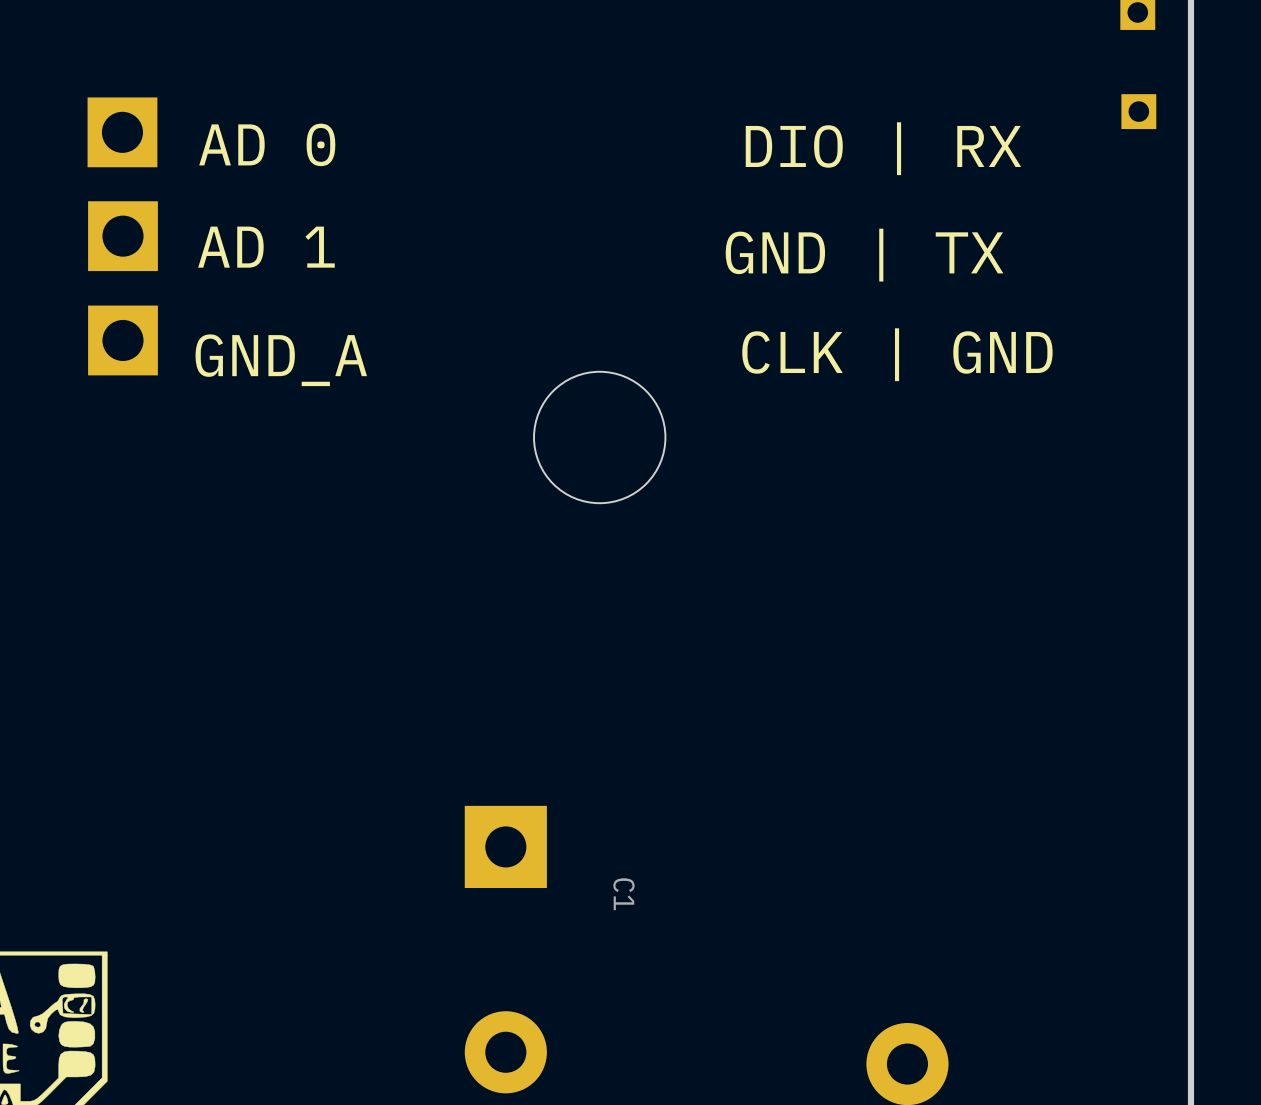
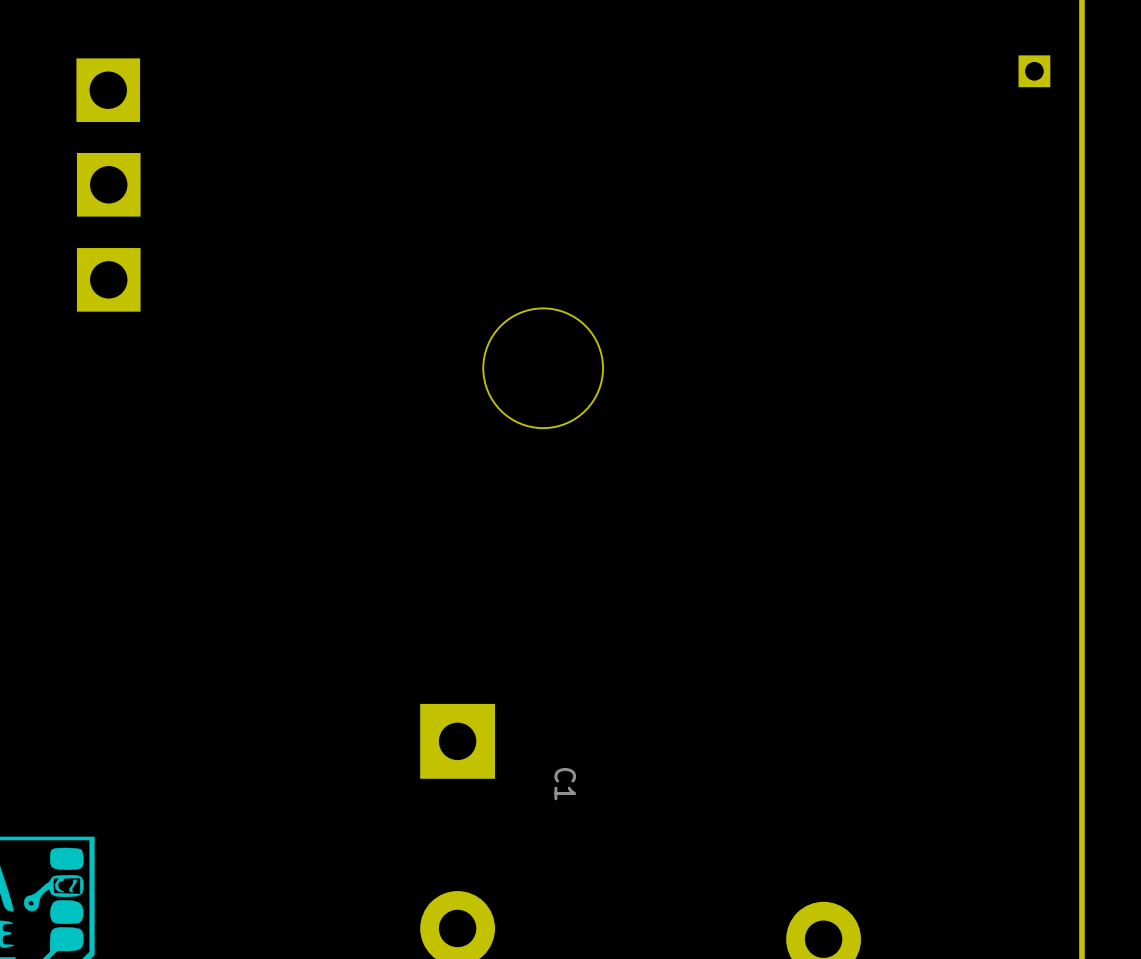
text: AD 0 (267, 144) -> none
text: DIO | RX (883, 148) -> none
text: AD 1 (266, 247) -> none
text: GND | TX (864, 255) -> none
text: CLK | GND (897, 354) -> none
text: GND_A (281, 360) -> none

